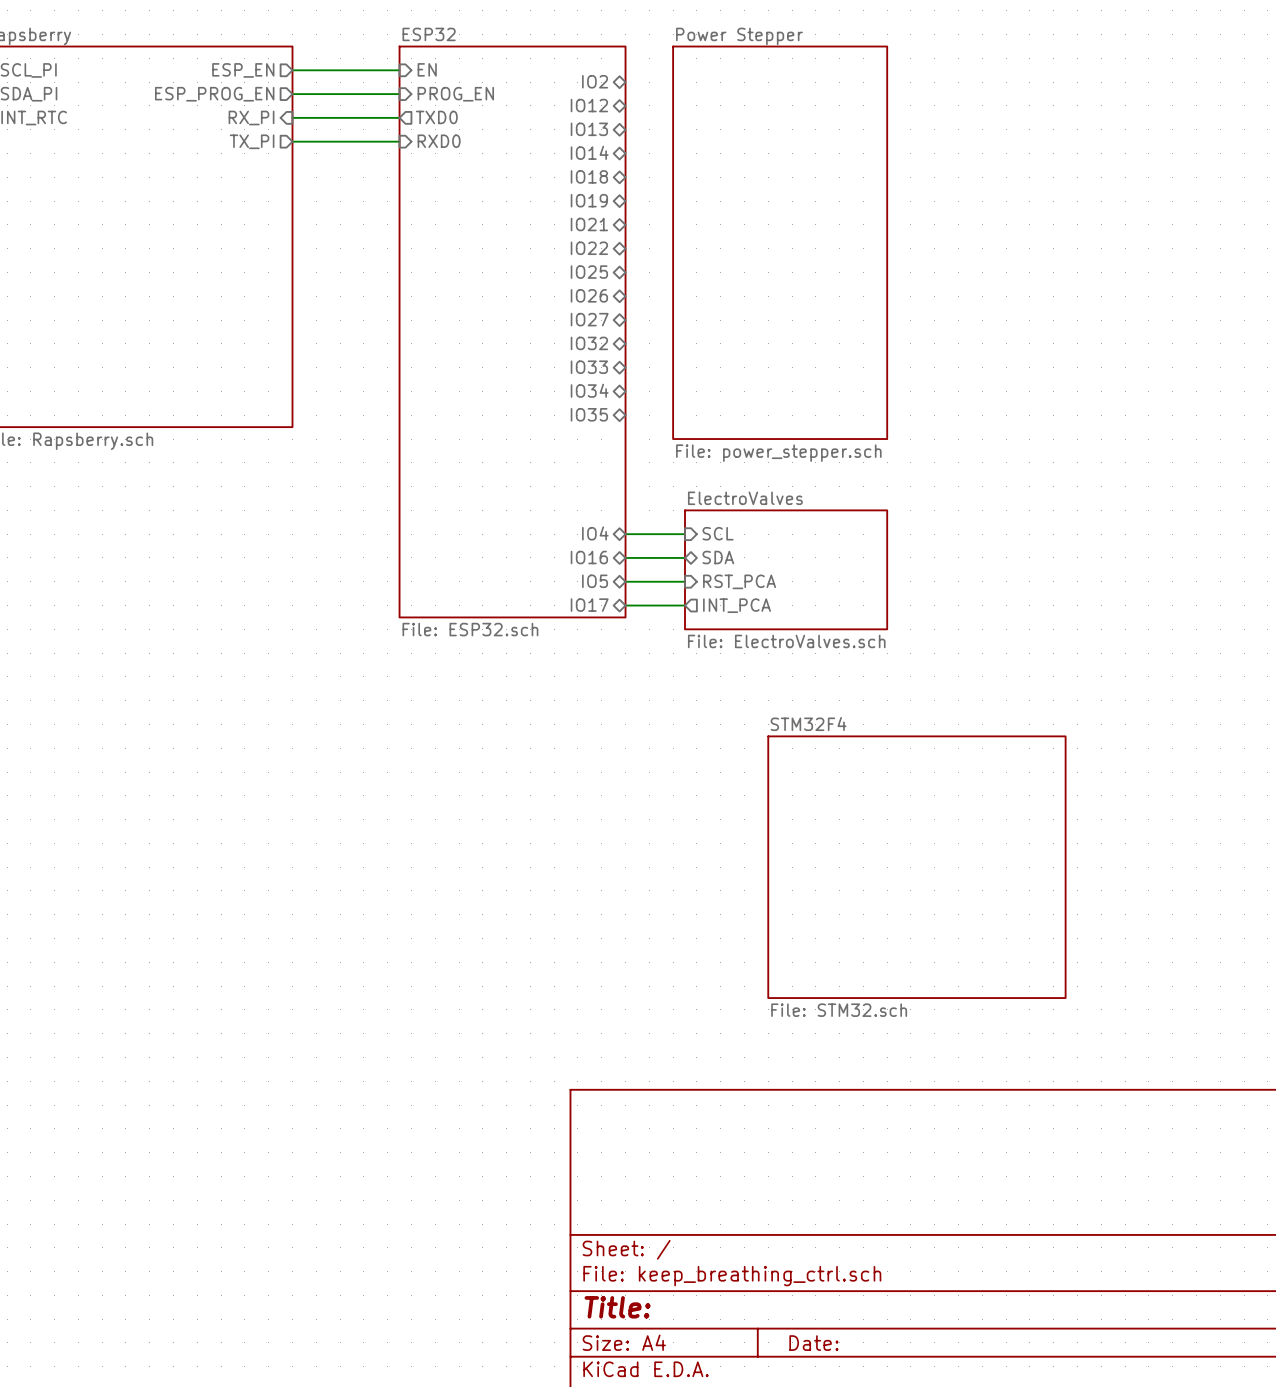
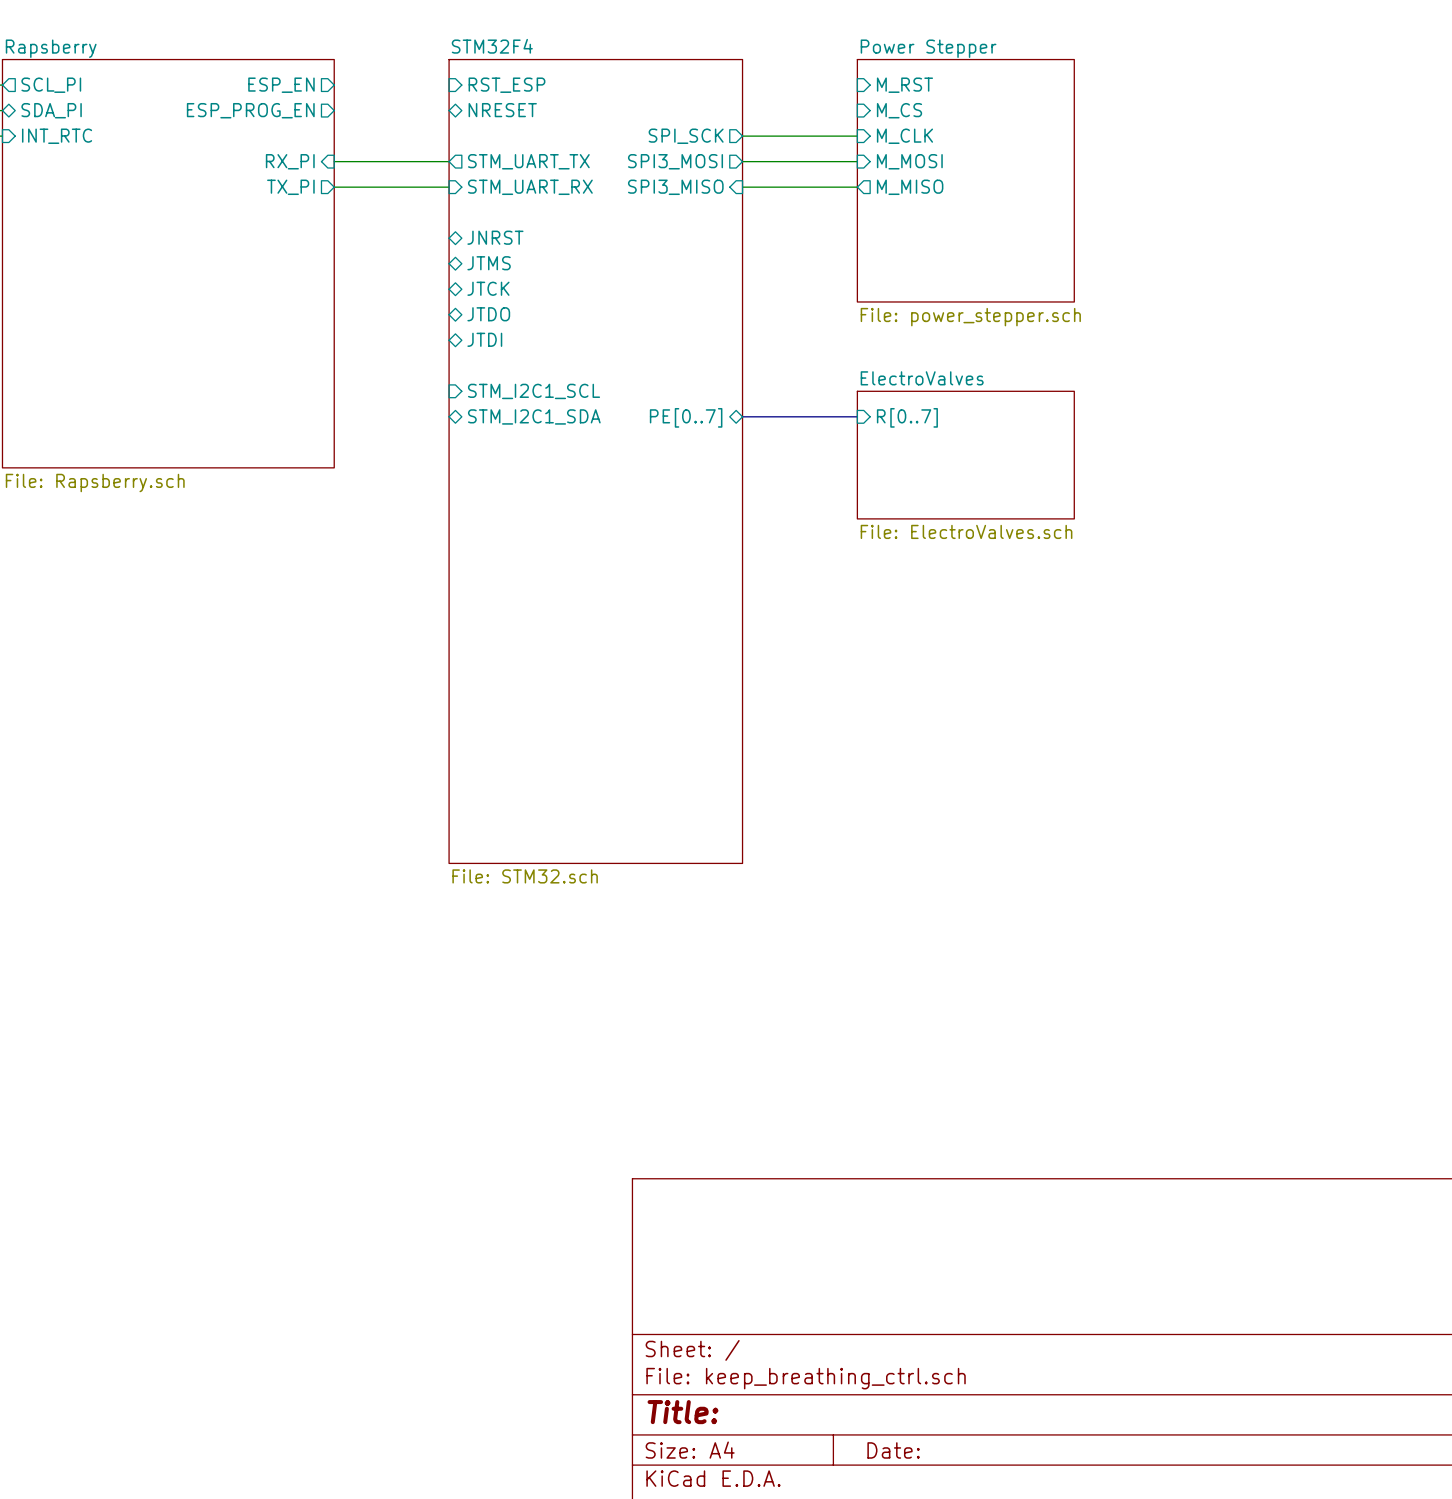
sheet pin: EN (427, 69) -> RST_ESP (506, 85)
wire: (292, 70) (399, 70) -> none
sheet pin: none -> M_RST (904, 85)
sheet pin: IO2 (595, 81) -> none
wire: (292, 94) (399, 94) -> none
sheet pin shape: input (455, 94) -> bidirectional (502, 110)
sheet pin: PROG_EN (455, 94) -> NRESET (502, 110)
sheet pin: none -> M_CS (899, 110)
sheet pin: IO12 (589, 105) -> none
wire: (292, 117) (399, 117) -> (334, 187) (449, 187)
sheet pin: TXD0 (436, 117) -> none
wire: none -> (742, 136) (857, 136)
sheet pin: RX_PI (251, 118) -> none
sheet pin: none -> SPI_SCK (686, 136)
sheet pin: none -> M_CLK (904, 136)
sheet pin: IO13 (589, 129) -> none
sheet pin shape: output (252, 141) -> input (290, 161)
sheet pin: TX_PI (252, 141) -> RX_PI (290, 161)
sheet pin shape: input (439, 141) -> output (528, 161)
sheet pin: RXD0 (439, 141) -> STM_UART_TX (528, 161)
sheet pin: none -> SPI3_MOSI (675, 161)
wire: none -> (742, 161) (857, 161)
sheet pin: none -> M_MOSI (909, 161)
sheet pin: IO14 (589, 152) -> none
sheet Power Stepper: none -> File: power_stepper.sch (965, 180)
sheet pin: none -> TX_PI (290, 187)
sheet pin: none -> STM_UART_RX (530, 187)
sheet pin: none -> SPI3_MISO (675, 187)
wire: none -> (742, 187) (857, 187)
sheet pin: none -> M_MISO (910, 187)
sheet pin: IO18 (589, 176) -> none
sheet pin: IO19 (589, 200) -> none
sheet pin: none -> JNRST (495, 237)
sheet pin: IO21 (589, 224) -> none
sheet pin: none -> JTMS (489, 263)
sheet Power Stepper: File: power_stepper.sch (780, 242) -> none
sheet pin: IO22 (589, 248) -> none
sheet pin: none -> JTCK (488, 288)
sheet pin: IO25 (589, 272) -> none
sheet pin: none -> JTDO (488, 314)
sheet pin: IO26 (589, 295) -> none
sheet pin: none -> JTDI (484, 339)
sheet pin: IO27 (589, 319) -> none
sheet ESP32: File: ESP32.sch (512, 331) -> none
sheet pin: IO32 (589, 343) -> none
sheet pin: none -> STM_I2C1_SCL (534, 391)
sheet pin: IO33 (589, 367) -> none
sheet pin: none -> STM_I2C1_SDA (534, 416)
bus: none -> (742, 416) (857, 416)
sheet pin: none -> PE[0..7] (686, 417)
sheet pin: none -> R[0..7] (907, 417)
sheet pin: IO34 (589, 390) -> none
sheet pin: IO35 (589, 414) -> none
sheet pin: IO4 (595, 533) -> none
sheet pin: SCL (718, 533) -> none
wire: (625, 534) (685, 534) -> none
sheet pin: IO16 (589, 557) -> none
wire: (625, 557) (685, 557) -> none
sheet pin: SDA (718, 557) -> none
sheet ElectroValves position: (786, 569) -> (965, 455)
sheet pin: IO5 (595, 581) -> none
wire: (625, 581) (685, 581) -> none
sheet pin: RST_PCA (739, 581) -> none
sheet pin: IO17 (589, 605) -> none
wire: (625, 605) (685, 605) -> none
sheet pin: INT_PCA (737, 605) -> none
sheet STM32F4 name position: STM32F4 (808, 724) -> STM32F4 (492, 46)
sheet STM32F4 shape: [768, 736, 1066, 999] -> [449, 59, 743, 864]
sheet STM32F4 value position: File: STM32.sch (839, 1010) -> File: STM32.sch (525, 876)

